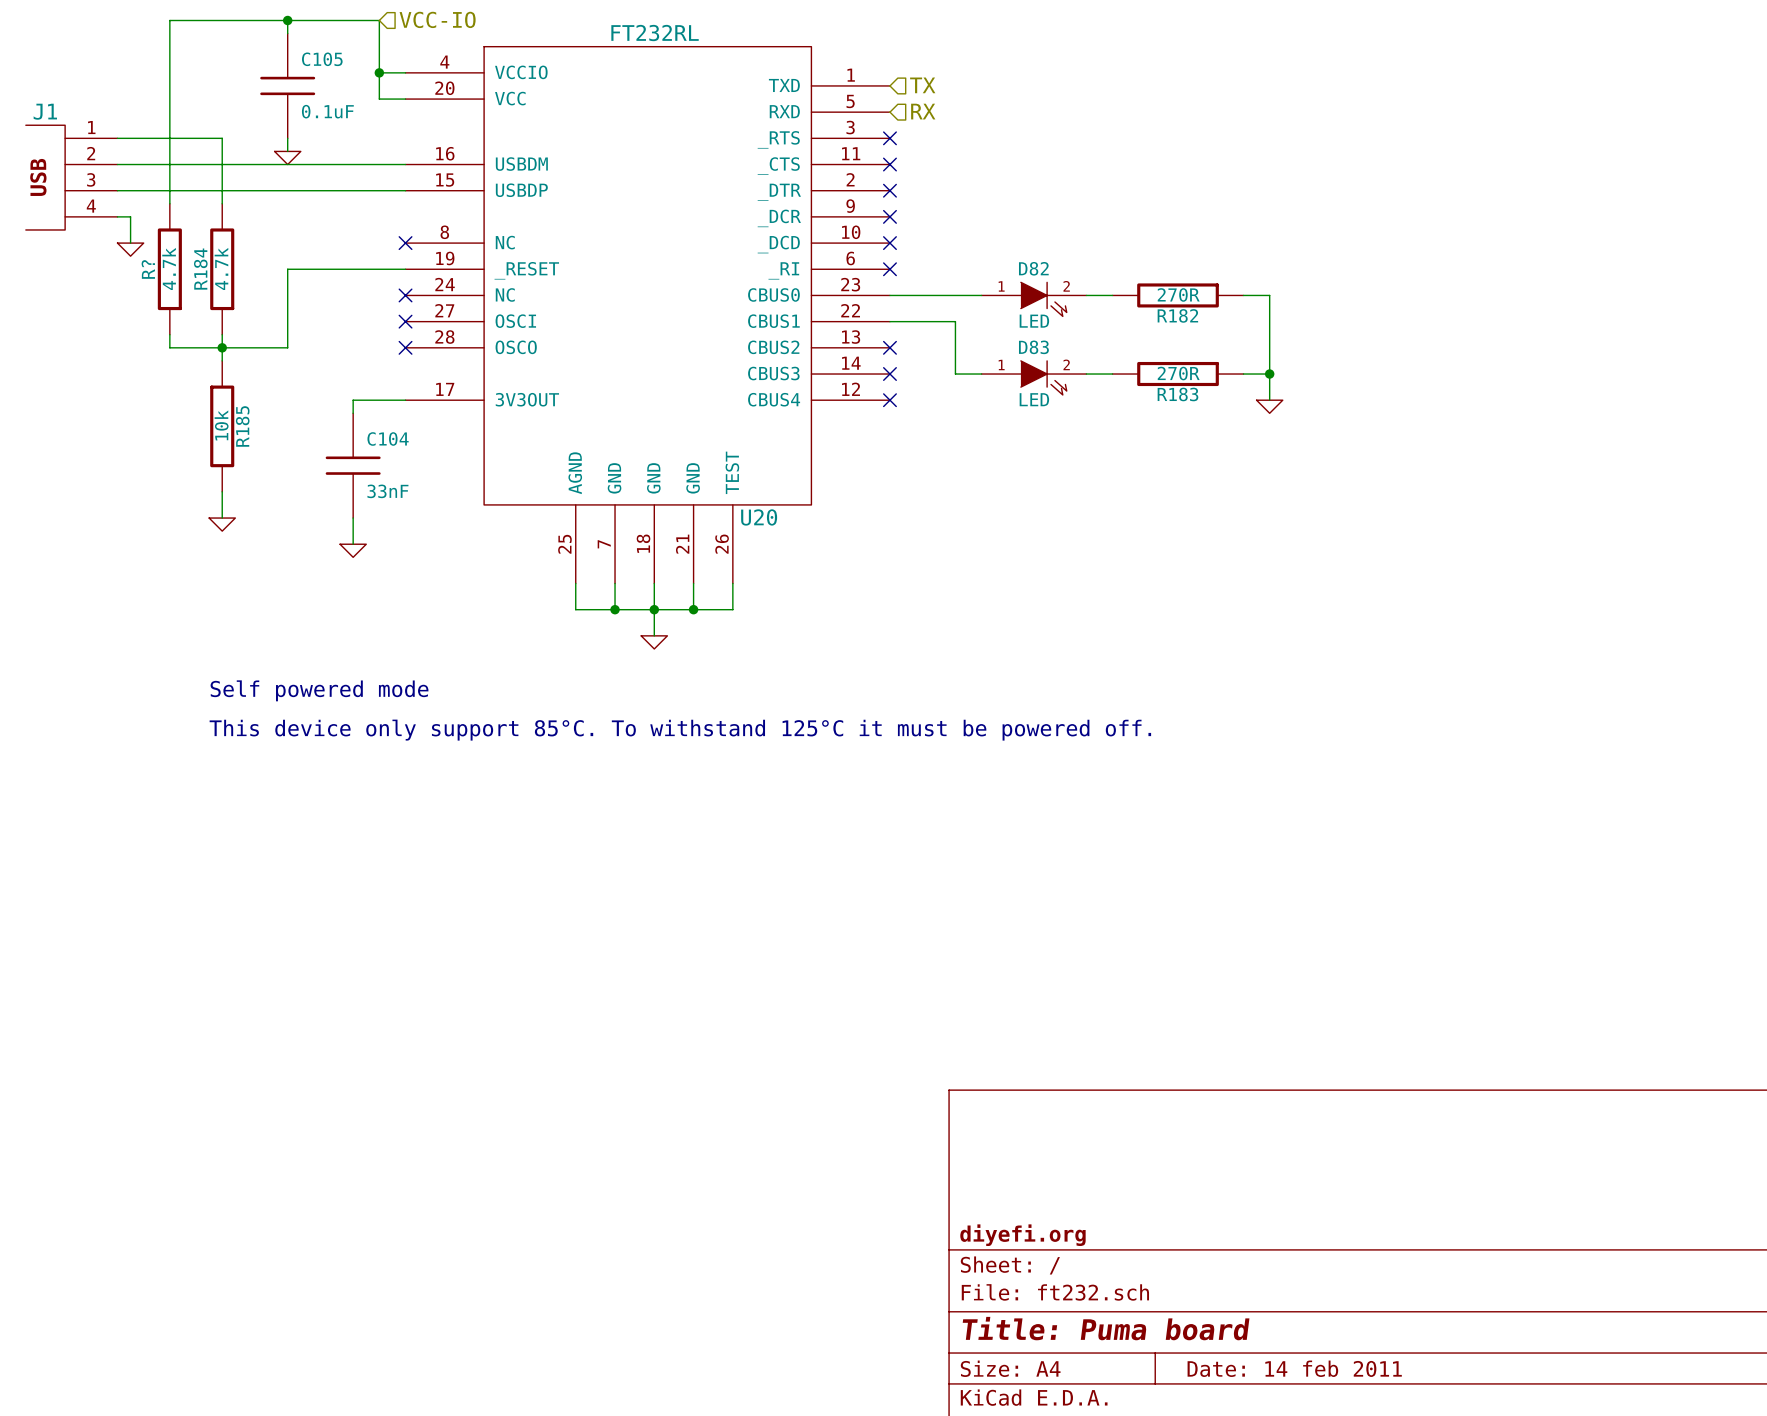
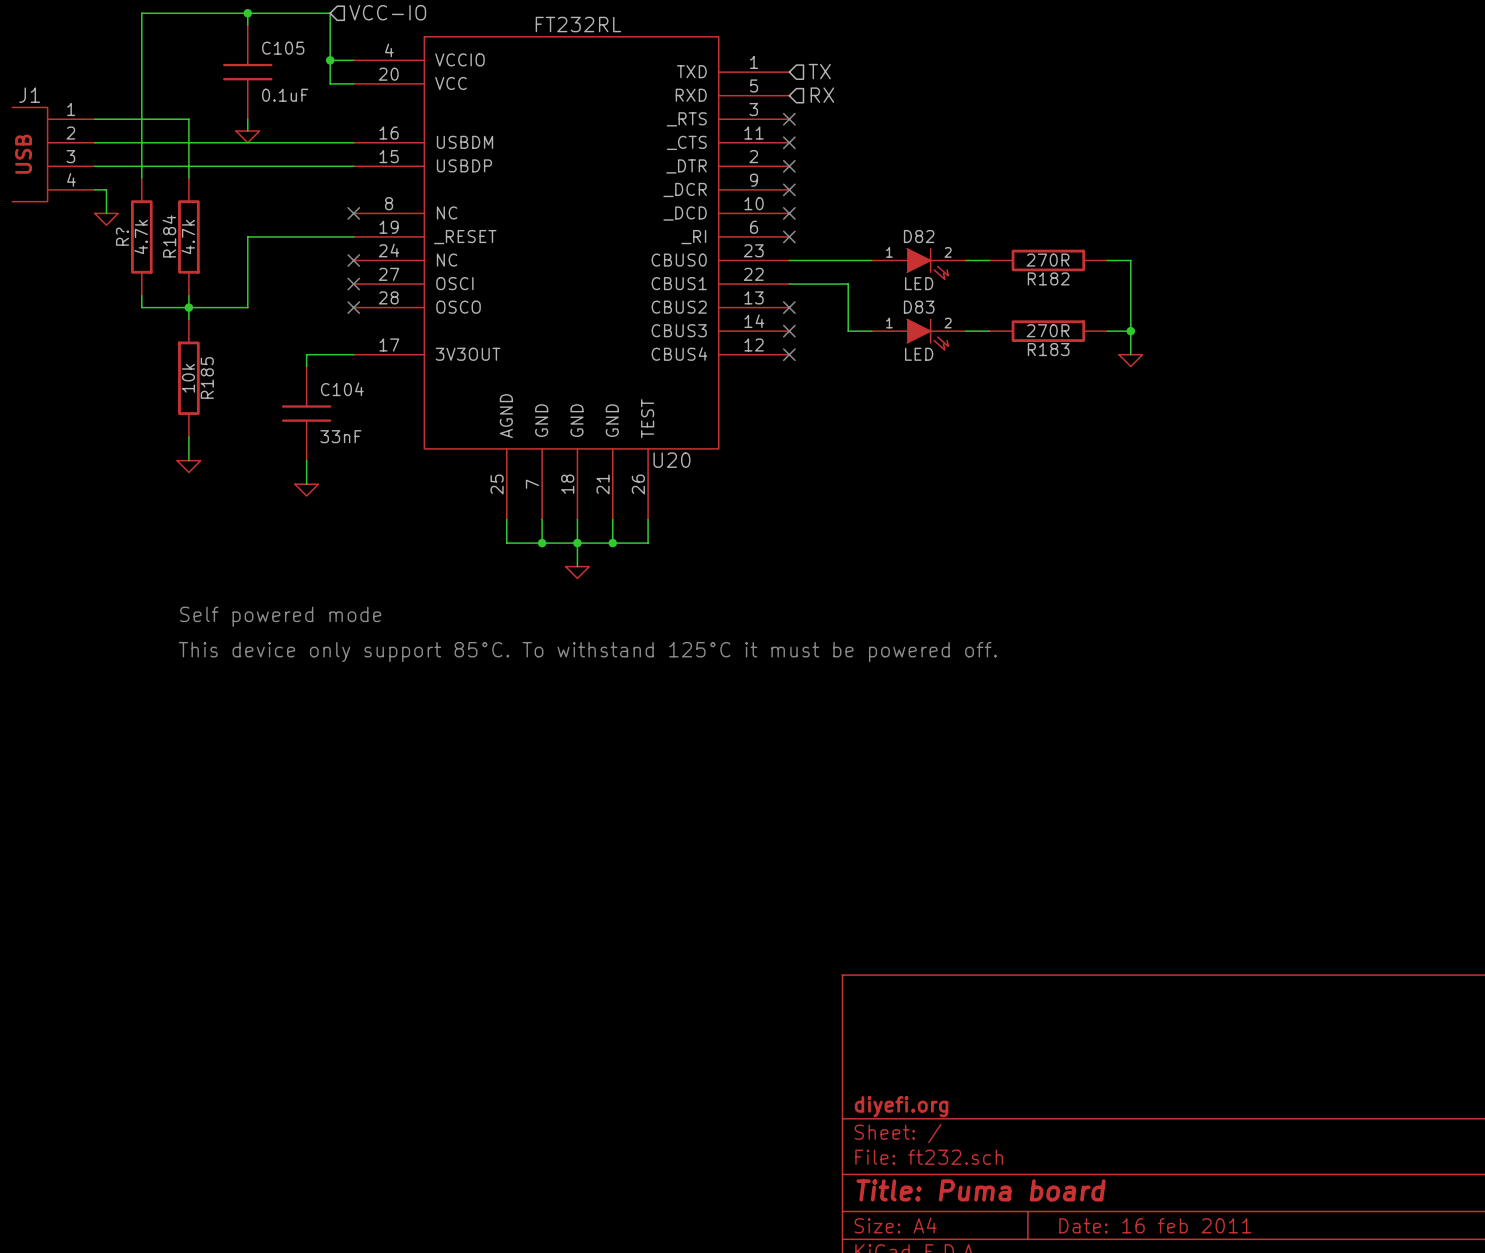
title block: Date: 14 feb 2011 (1294, 1368) -> Date: 16 feb 2011 (1155, 1225)

